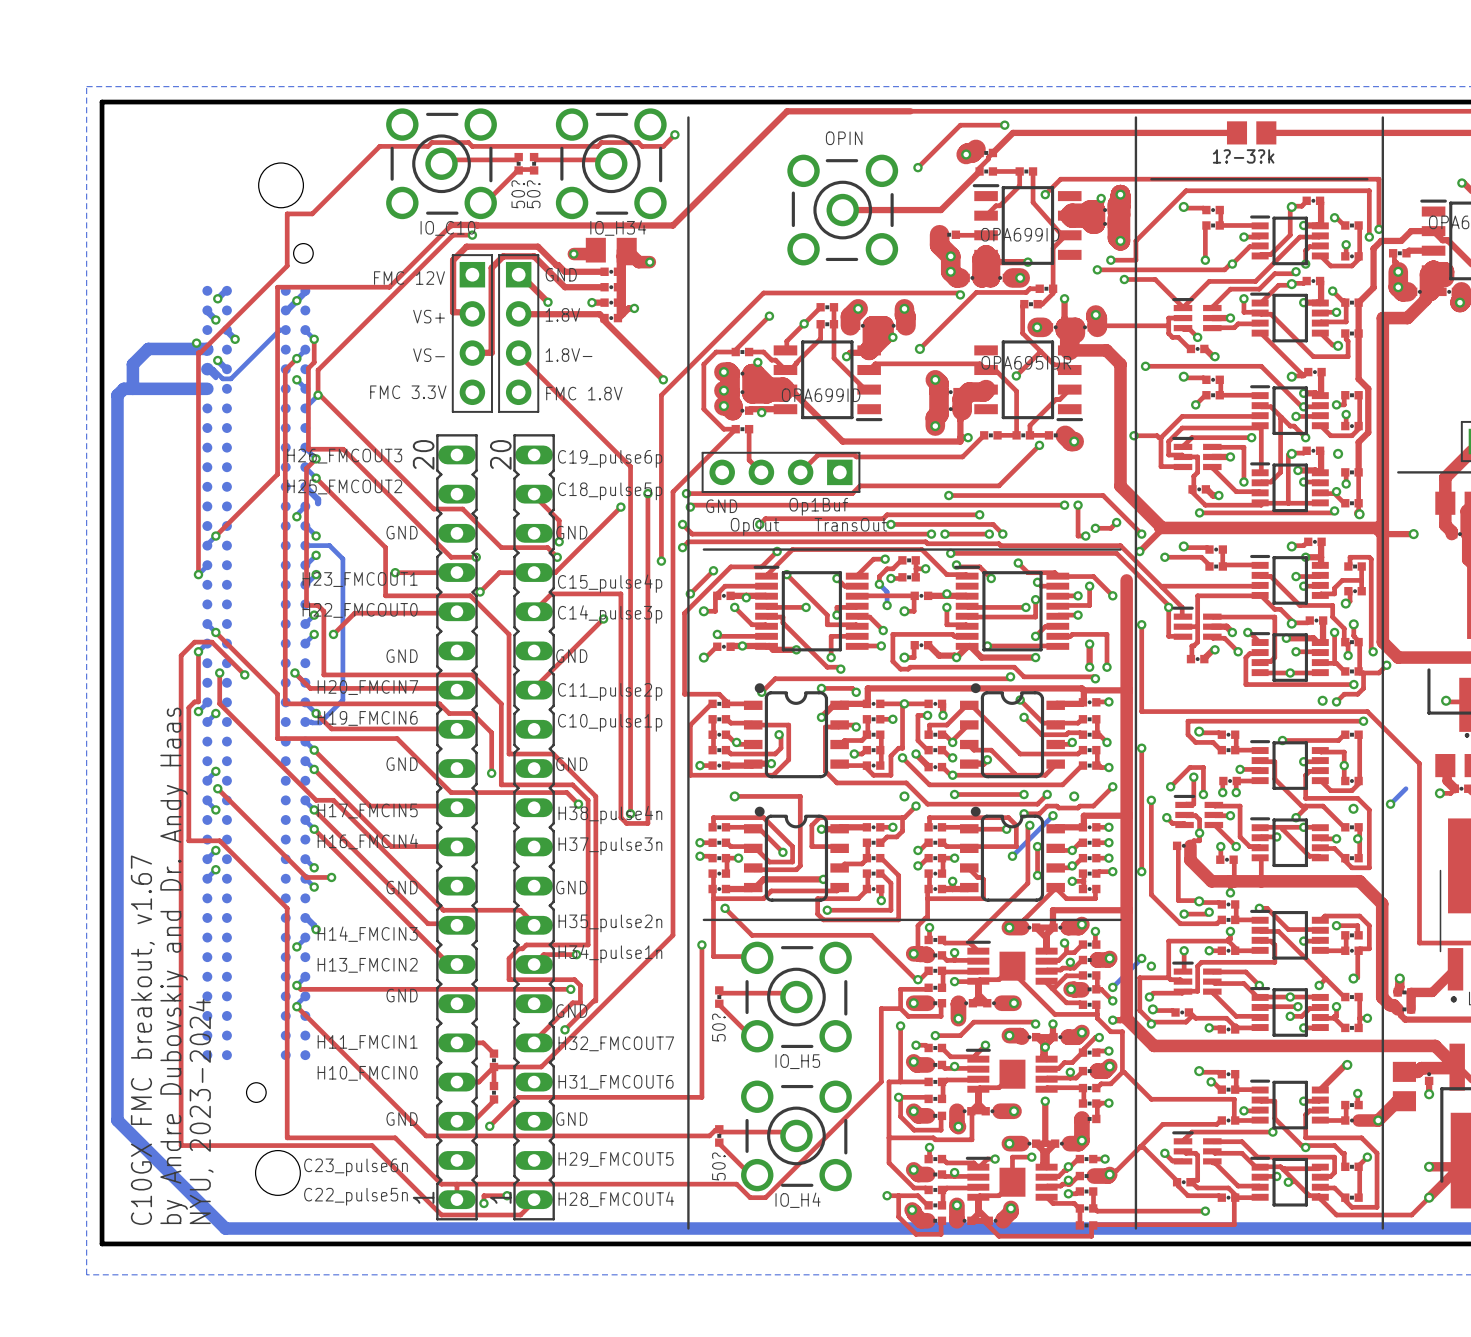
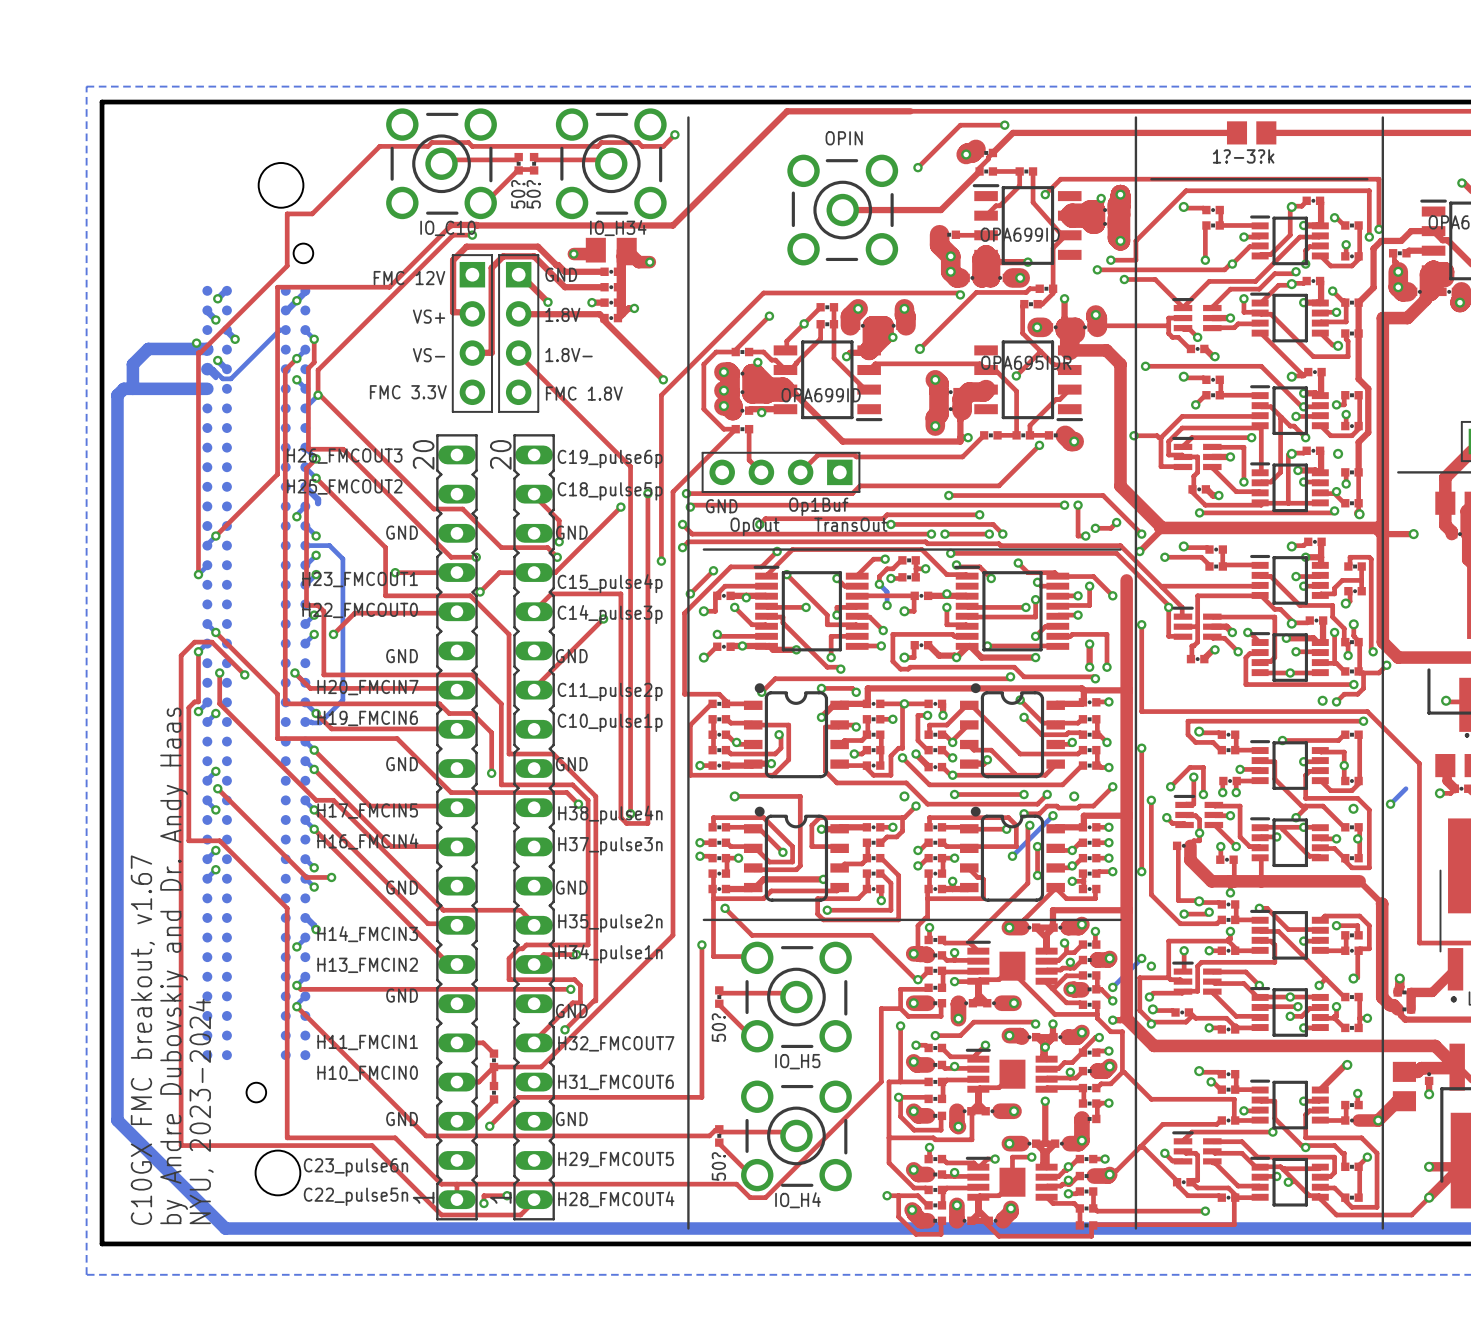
top track width: thick (1359, 881) (1381, 903) -> thin (1359, 881) (1381, 903)

